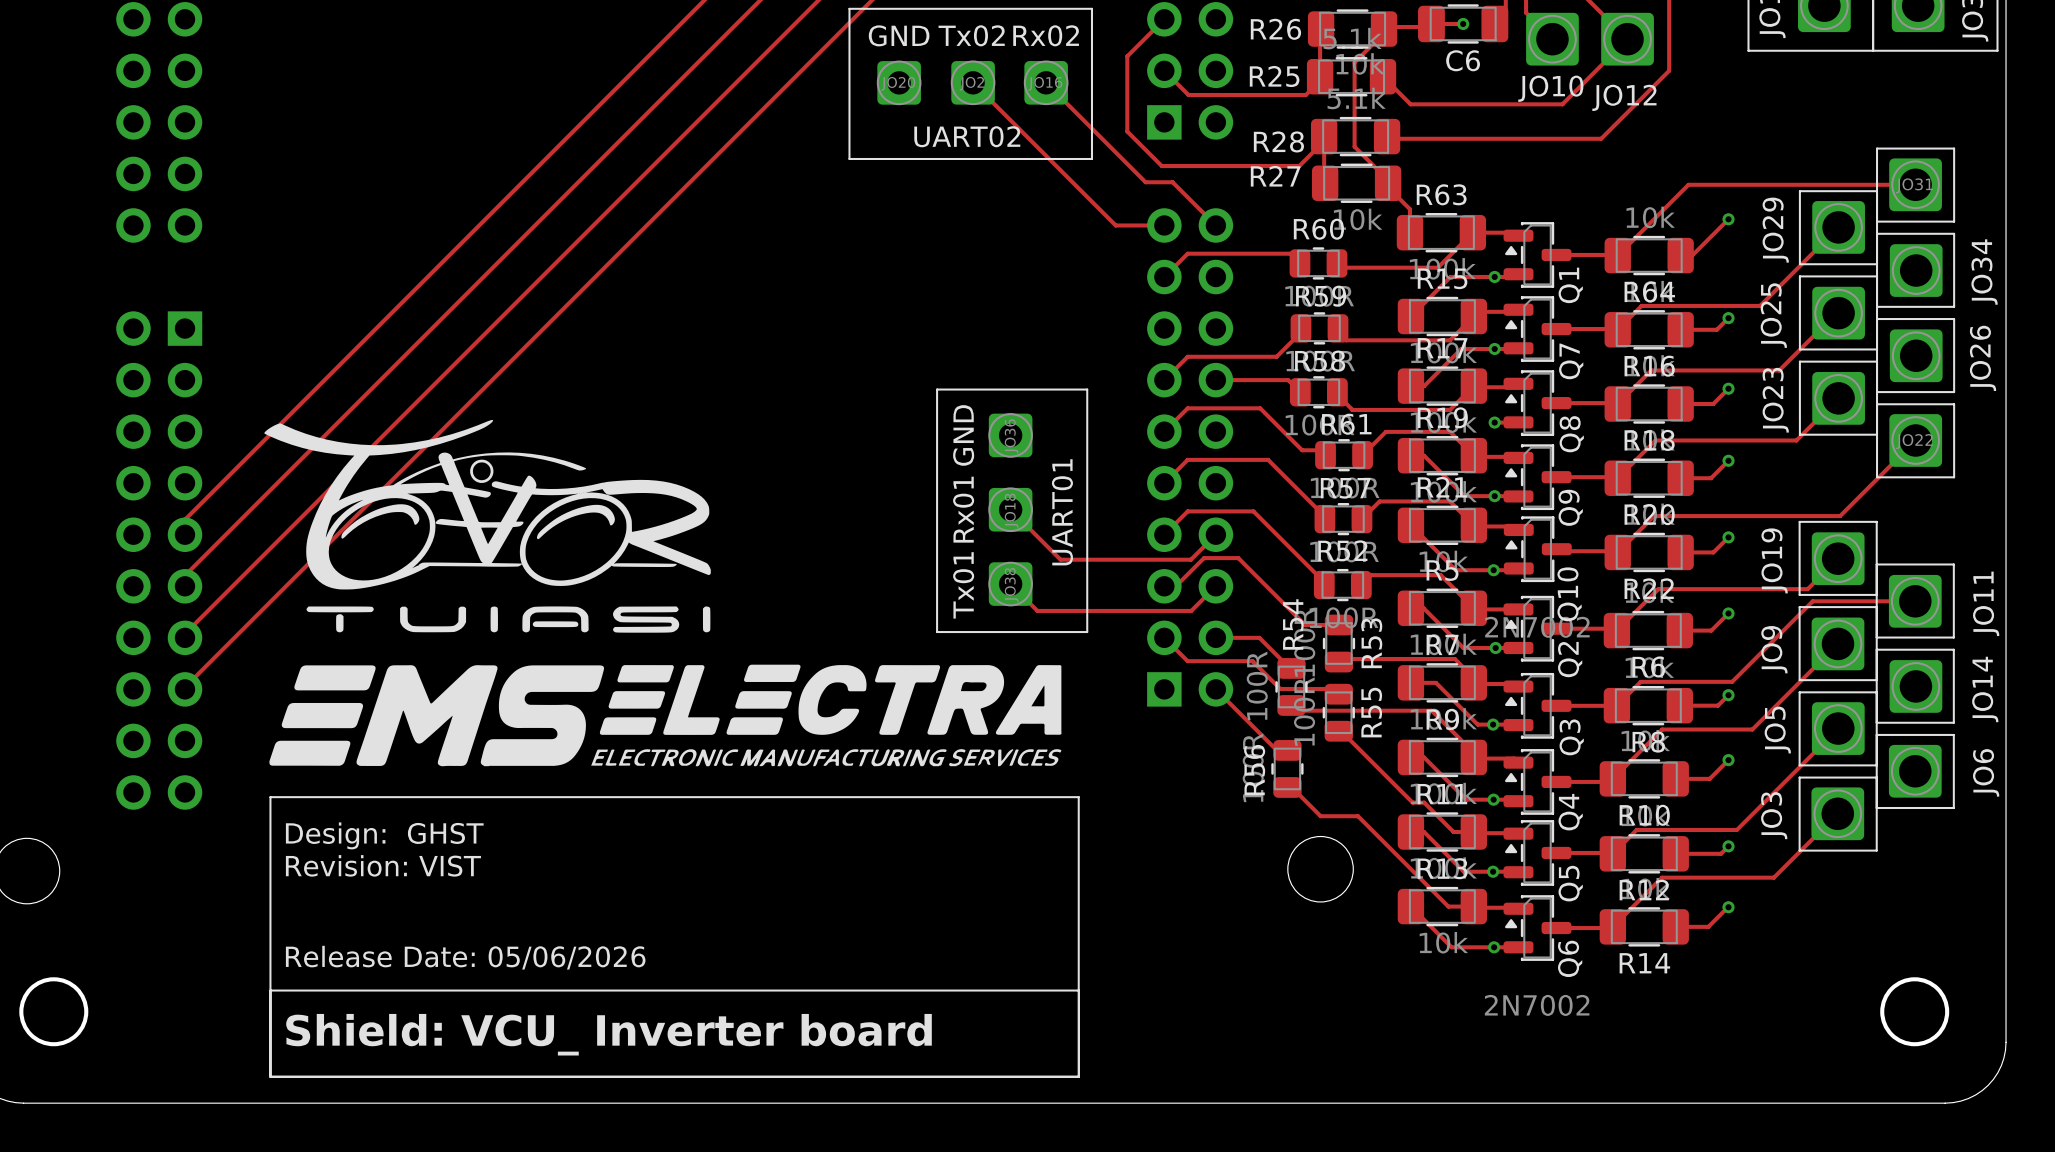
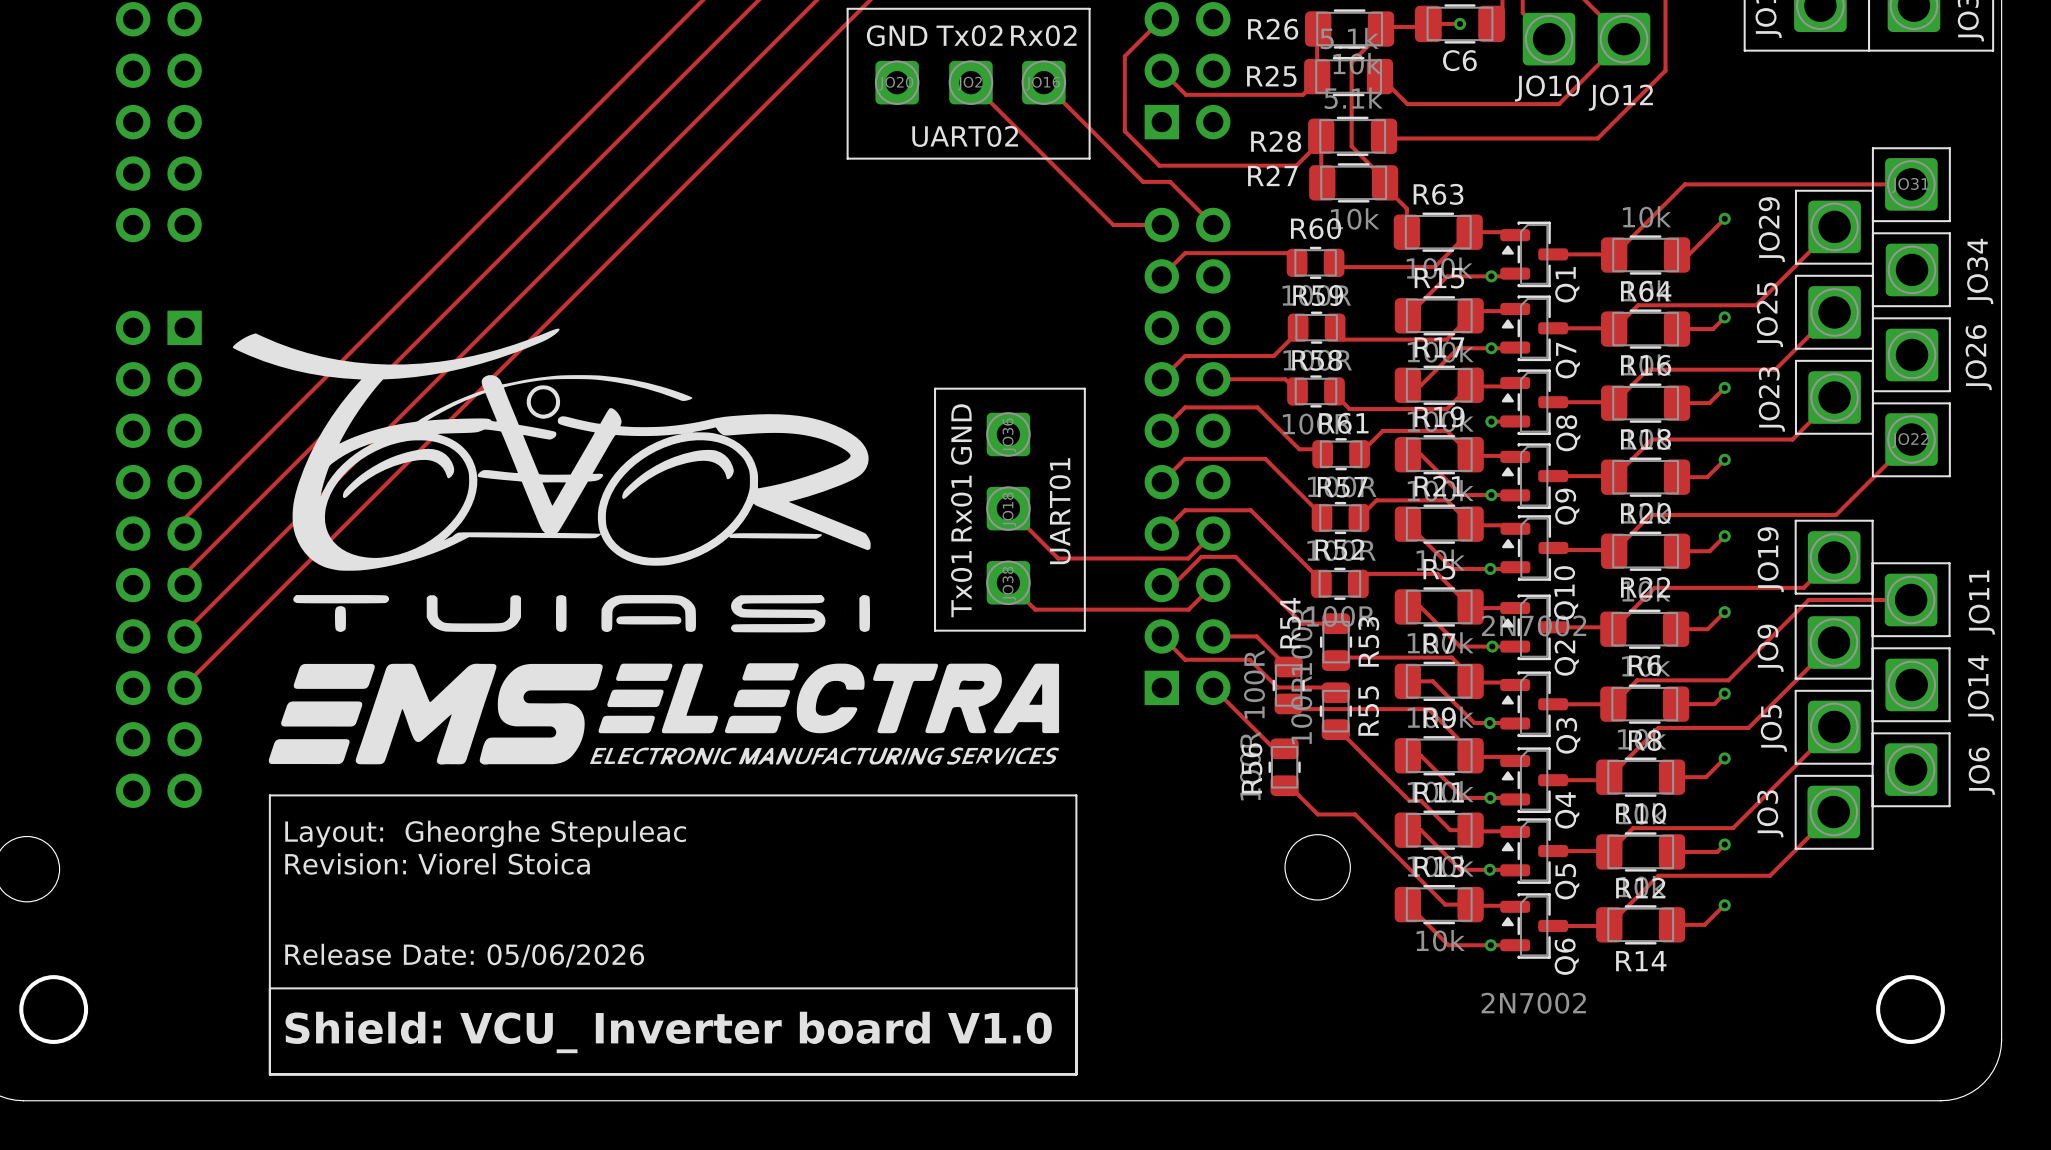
drawing: none -> [232, 328, 871, 633]
drawing: [264, 419, 711, 633] -> none
text: Design: GHST (384, 835) -> Layout: Gheorghe Stepuleac (485, 834)
text: Revision: VIST (383, 865) -> Revision: Viorel Stoica (437, 863)
text: Shield: VCU_ Inverter board (608, 1034) -> Shield: VCU_ Inverter board V1.0 (668, 1032)

